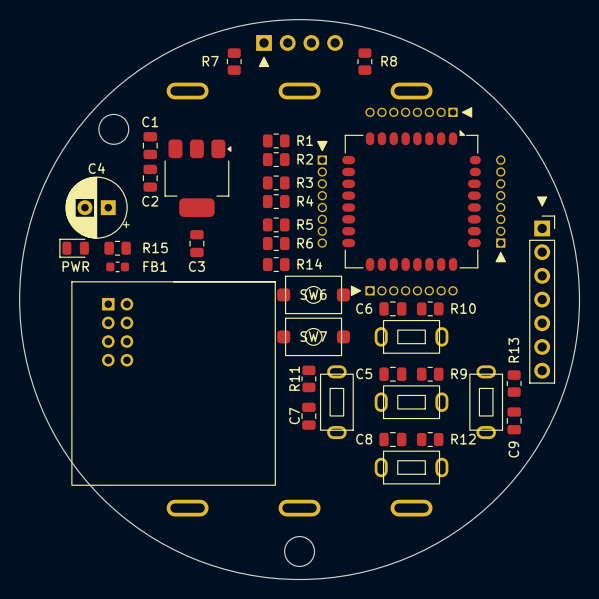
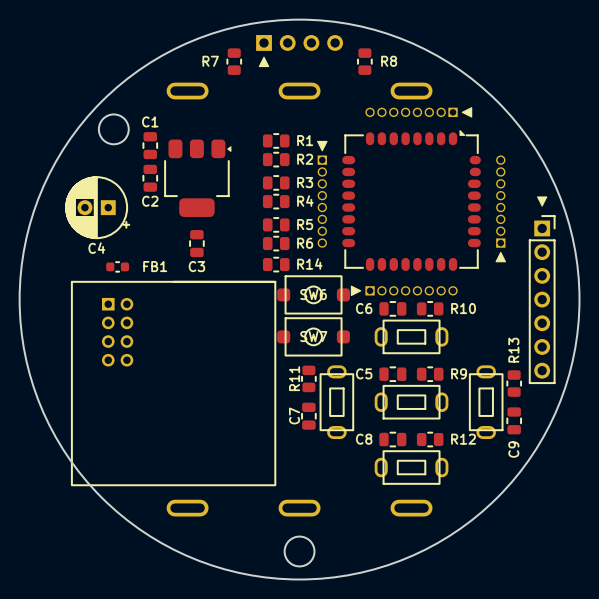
C4 name position: C4 (96, 168) -> C4 (96, 248)
PWR: (74, 248) -> none
R15: (117, 248) -> none

